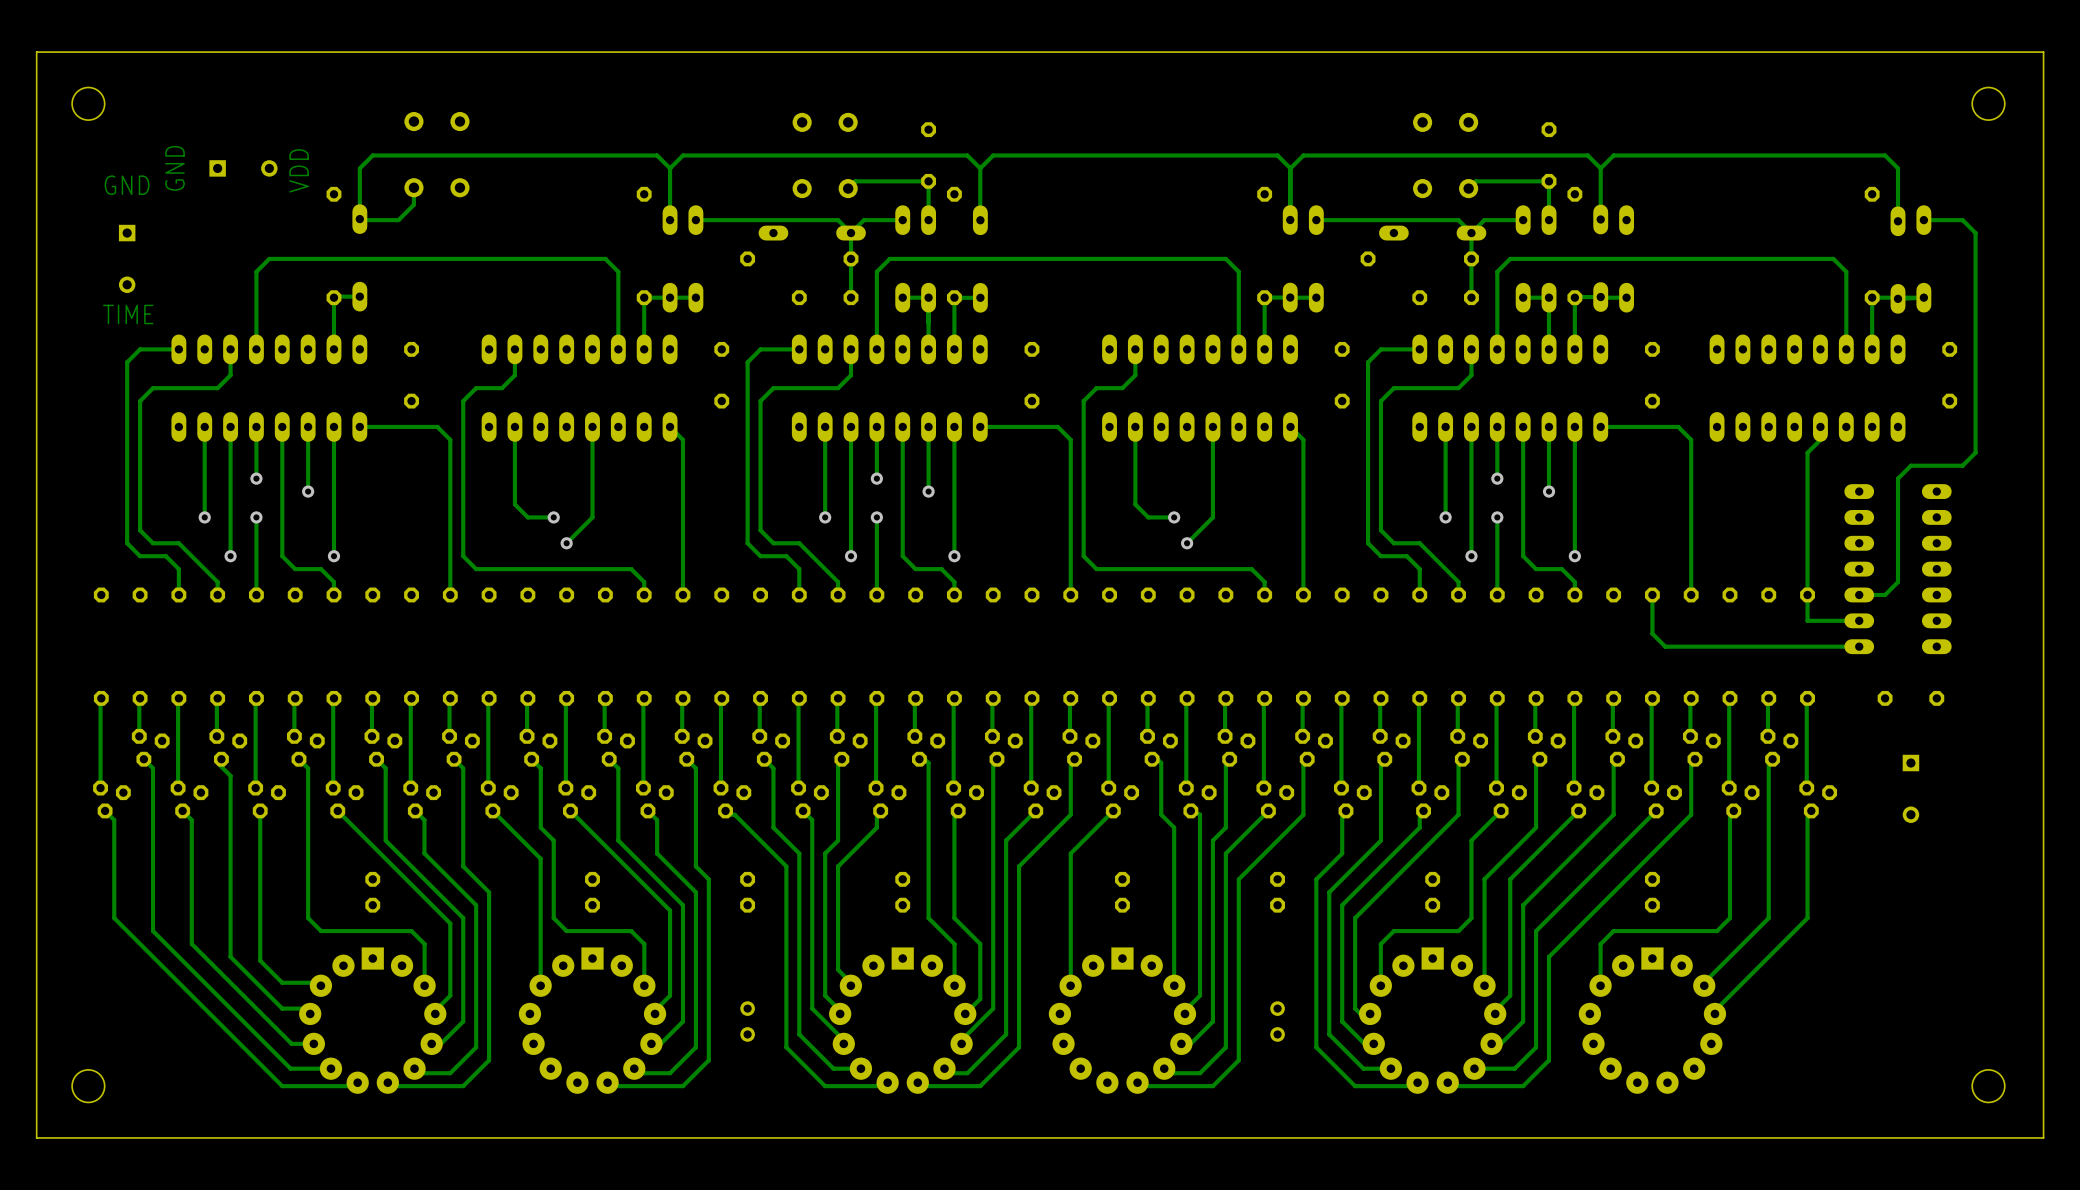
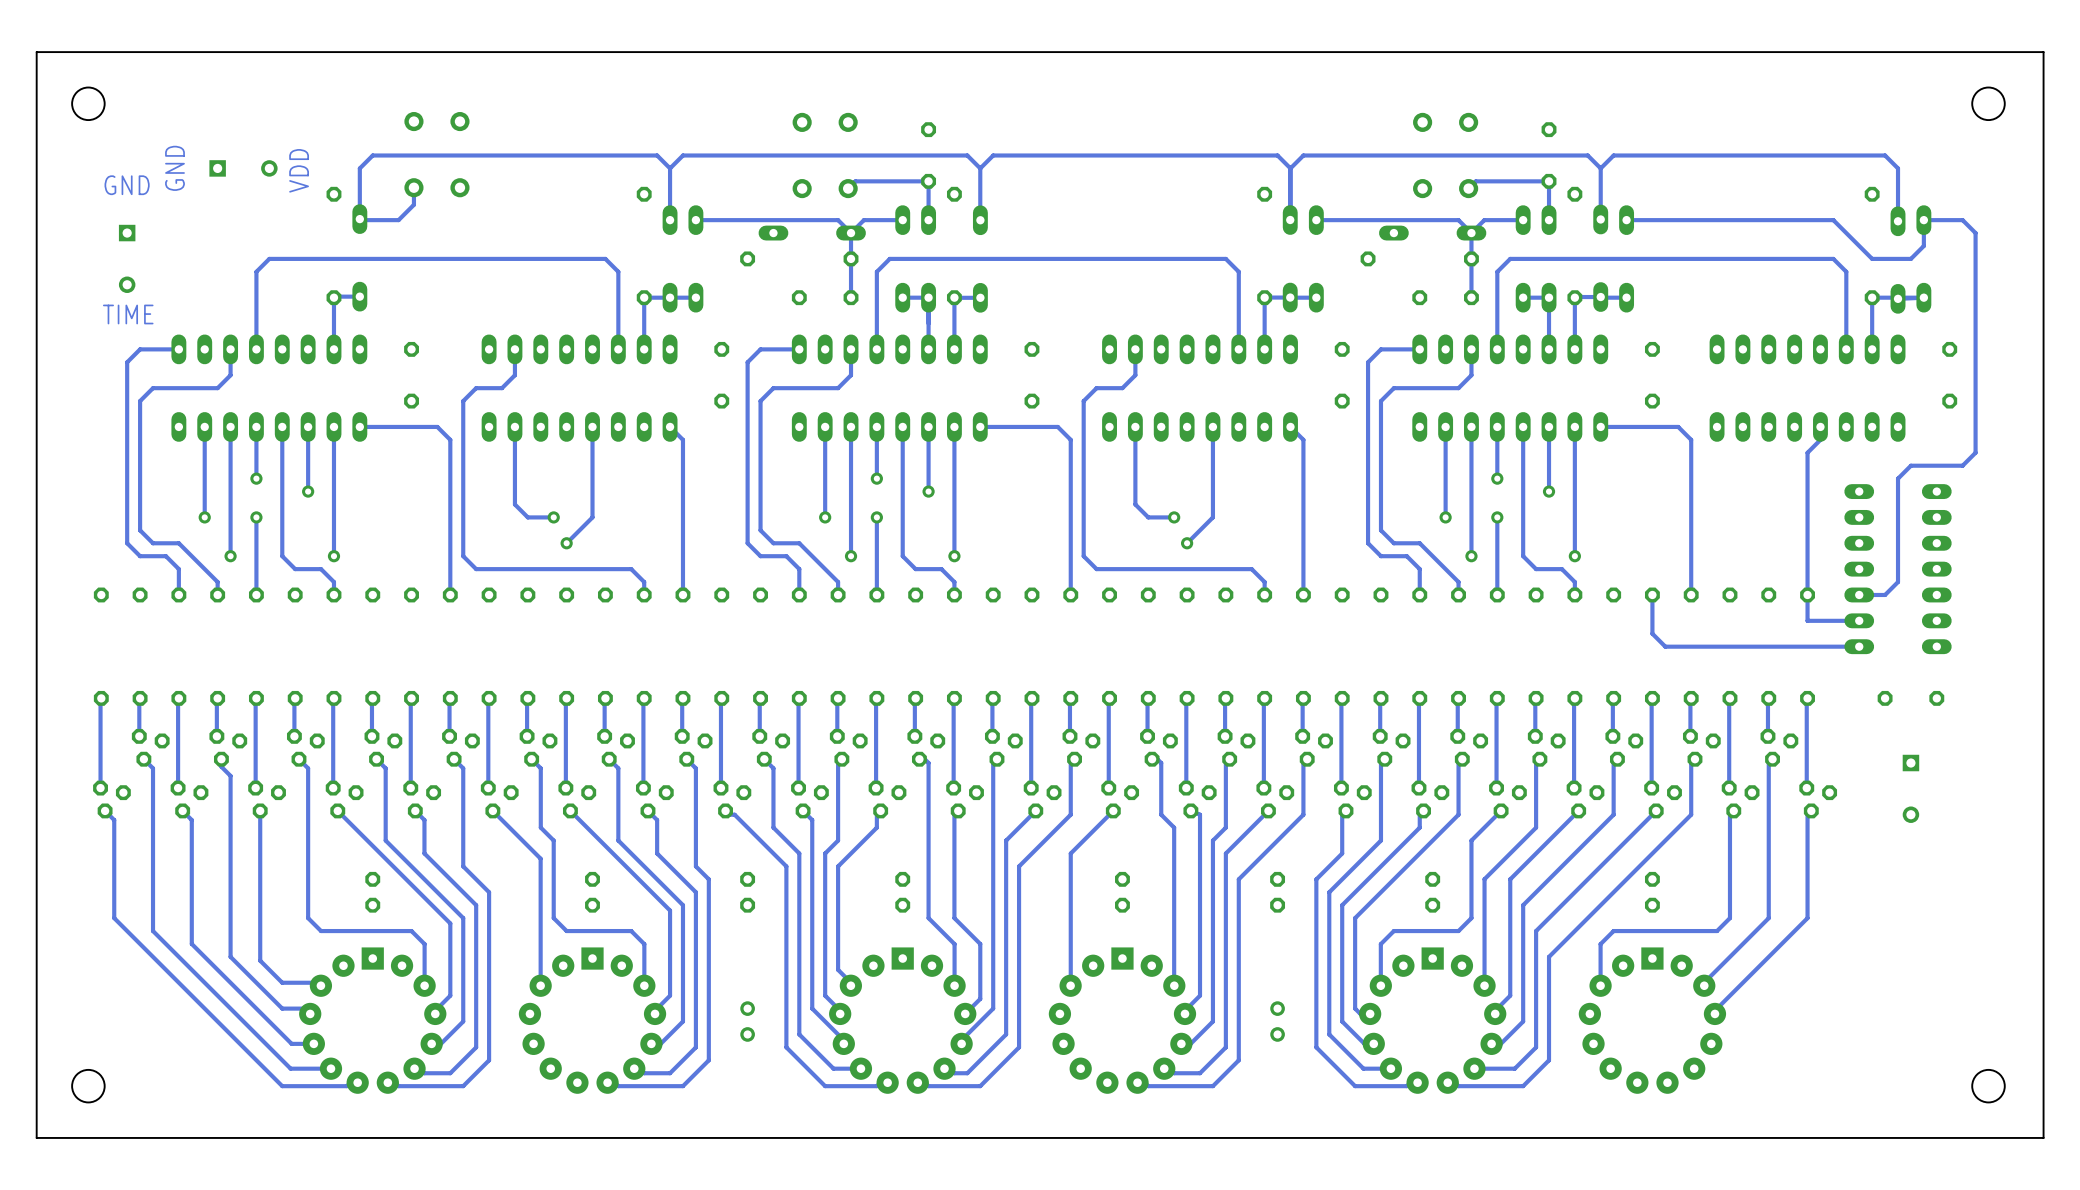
track: none -> (1923, 220) (1923, 245) (1910, 258) (1872, 258) (1833, 220) (1626, 220)

